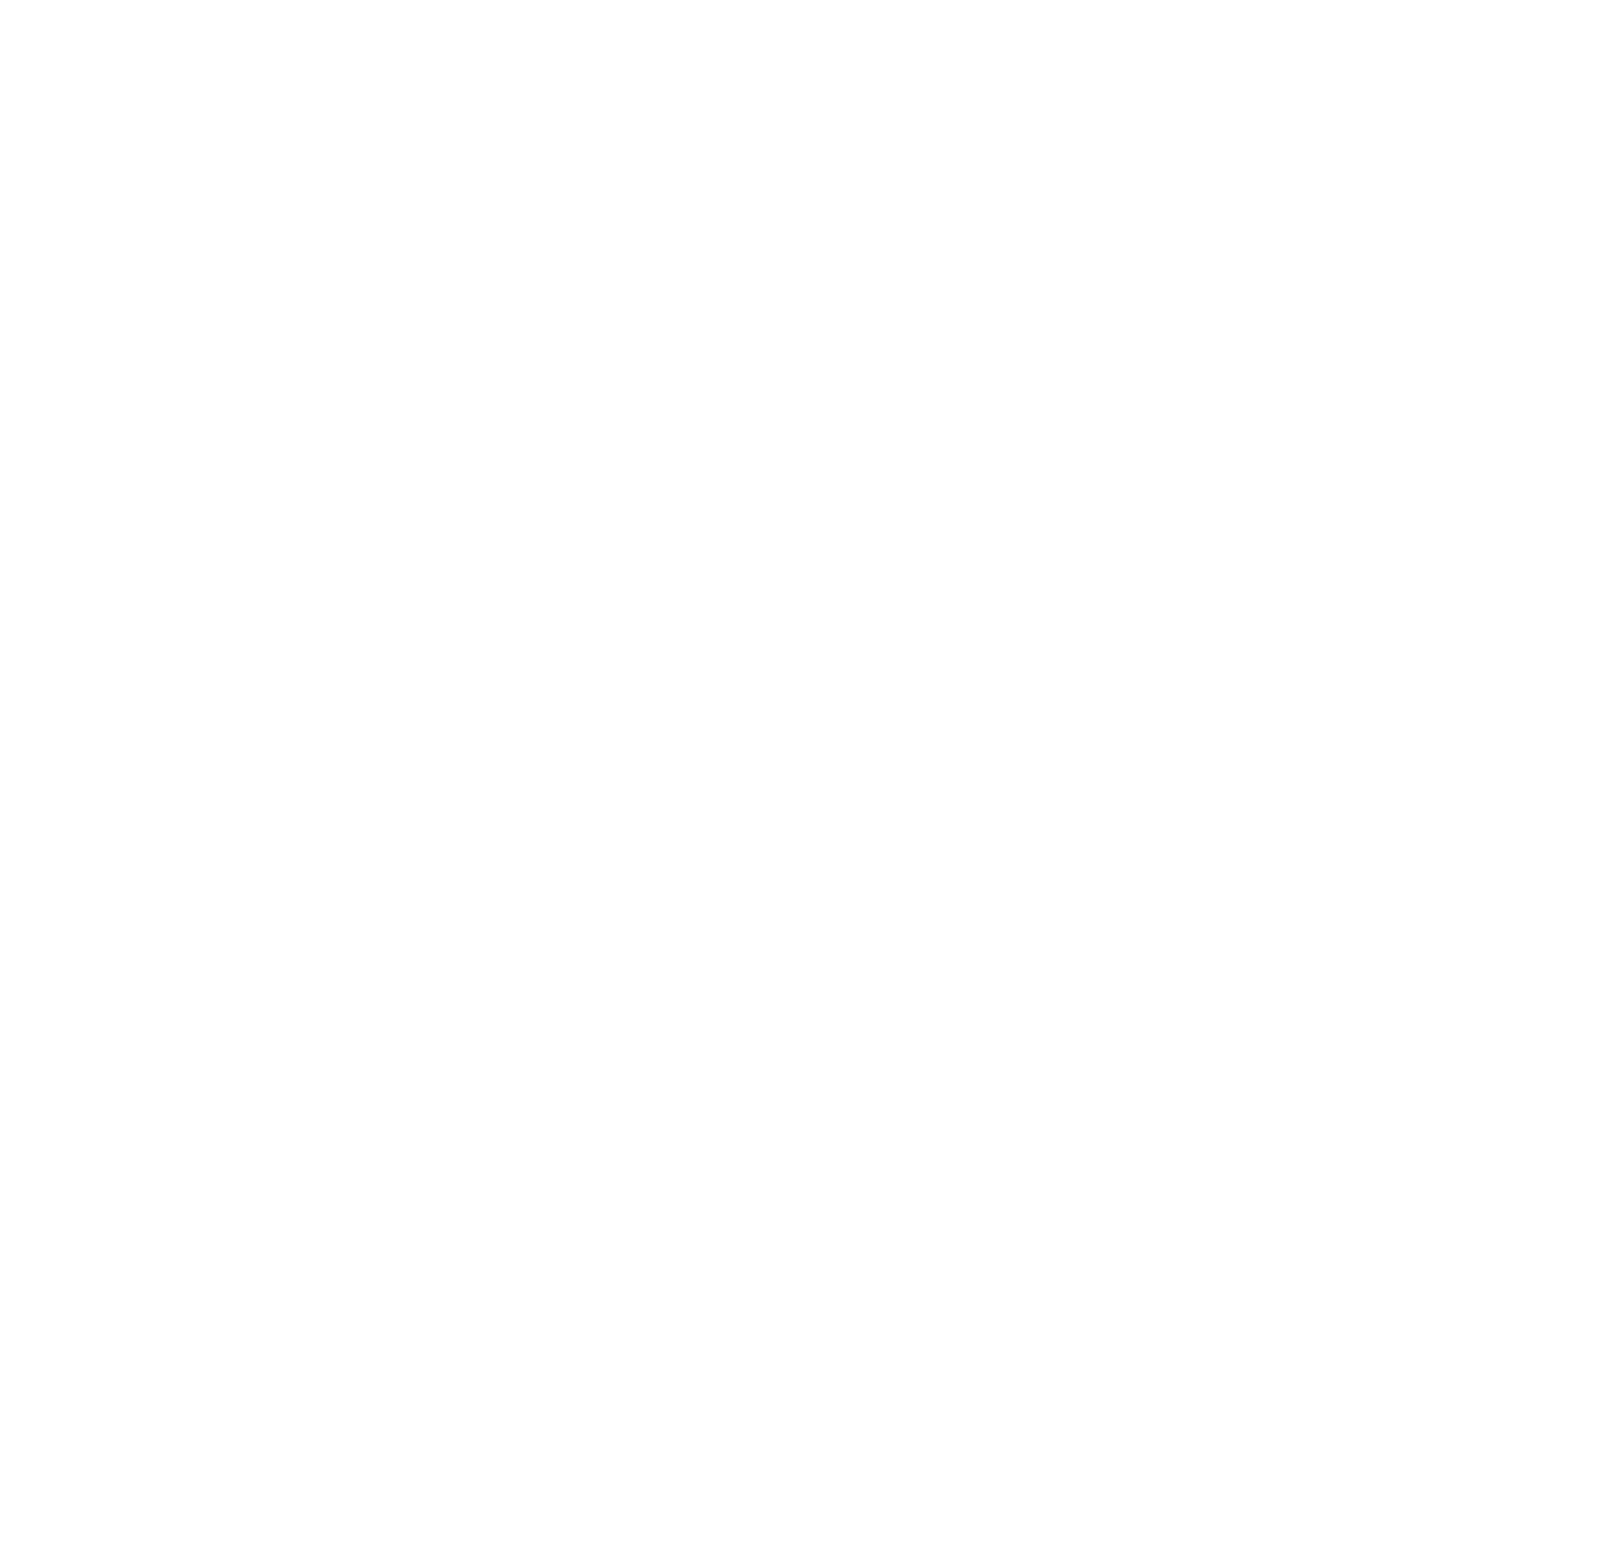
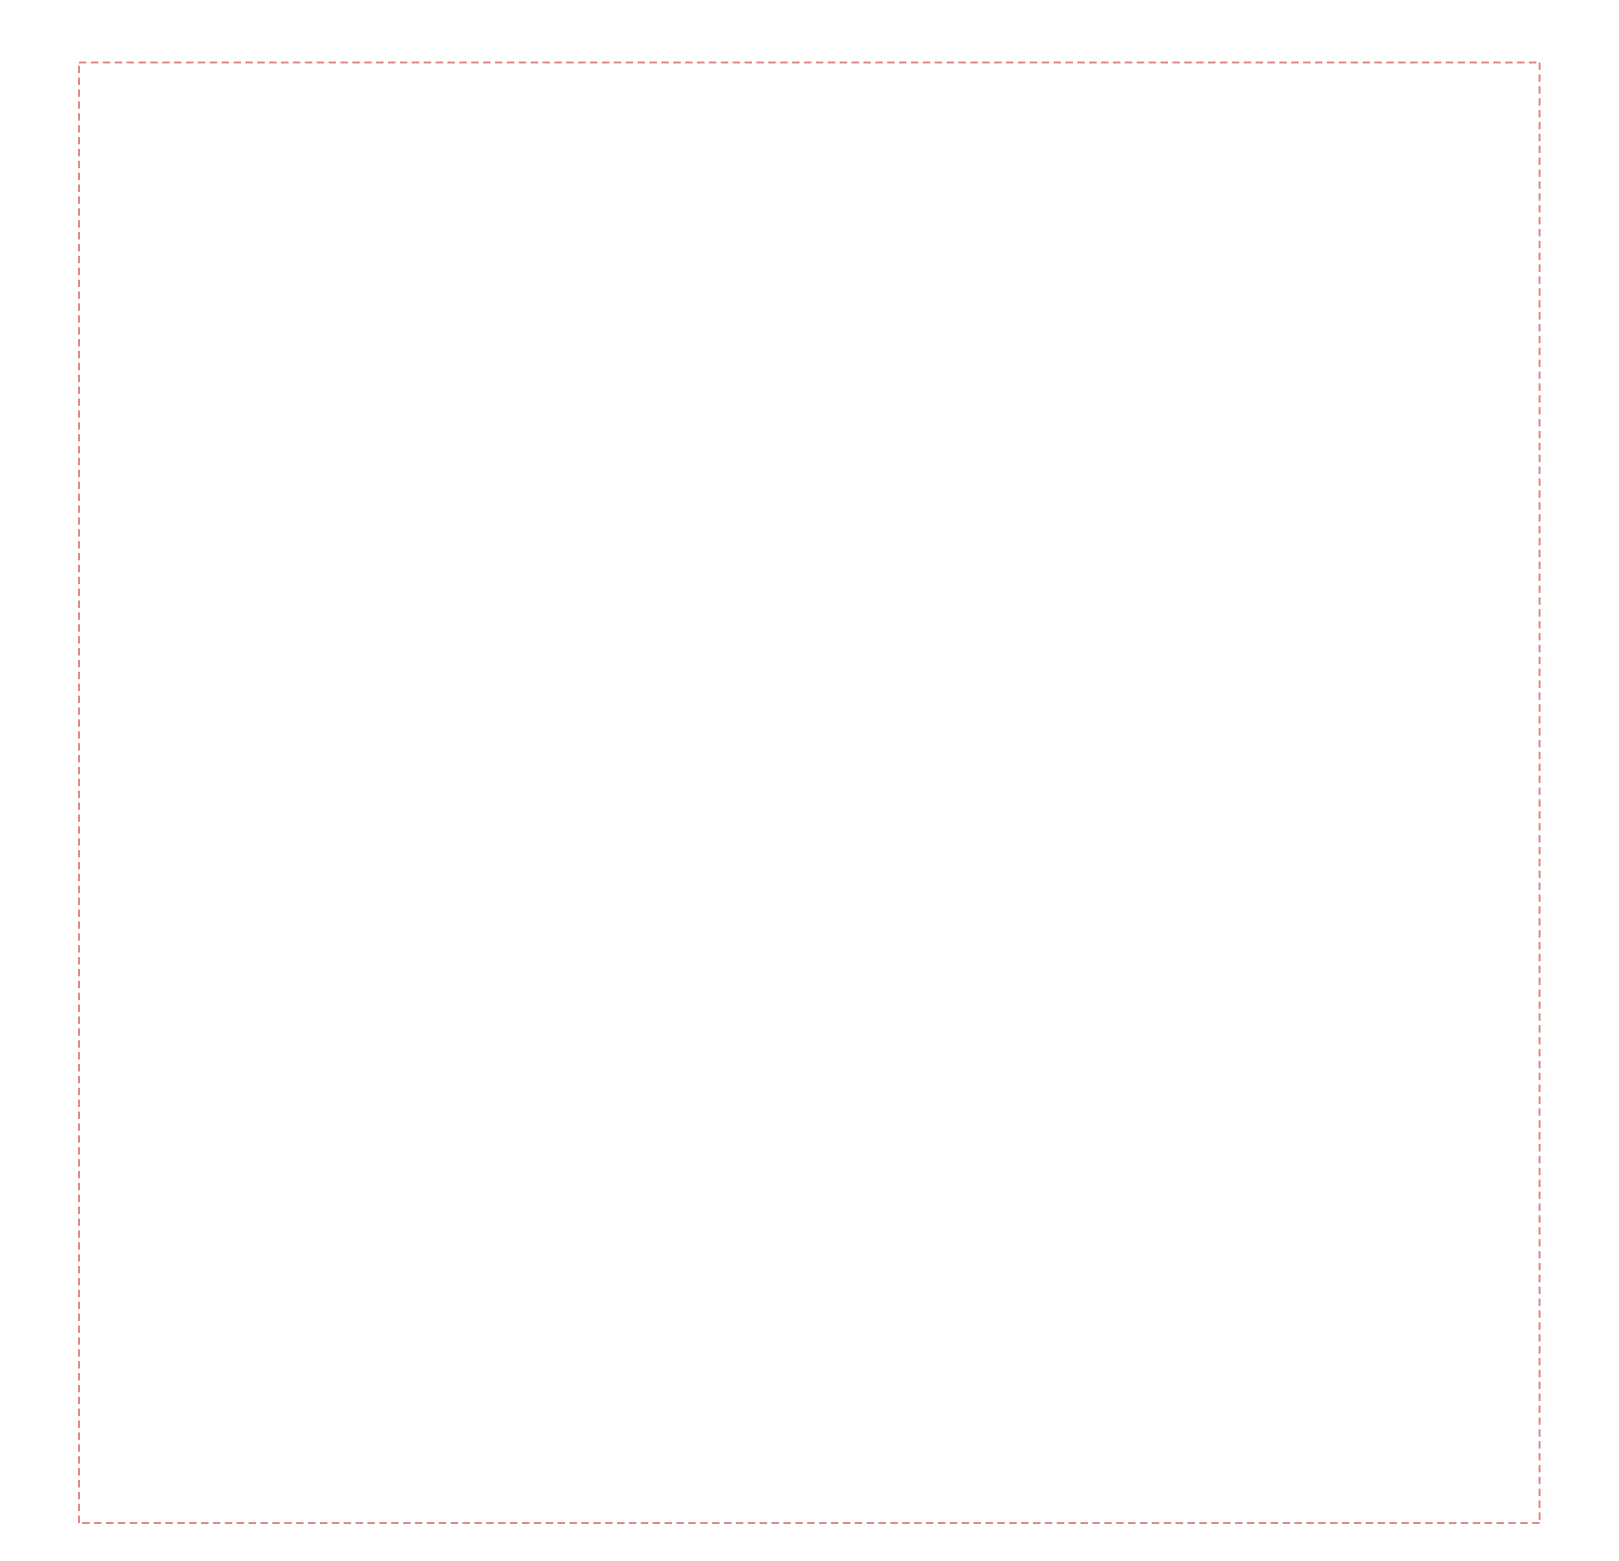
zone outline: none -> (79, 62) (1539, 62) (1539, 1523) (79, 1523) (79, 62)

